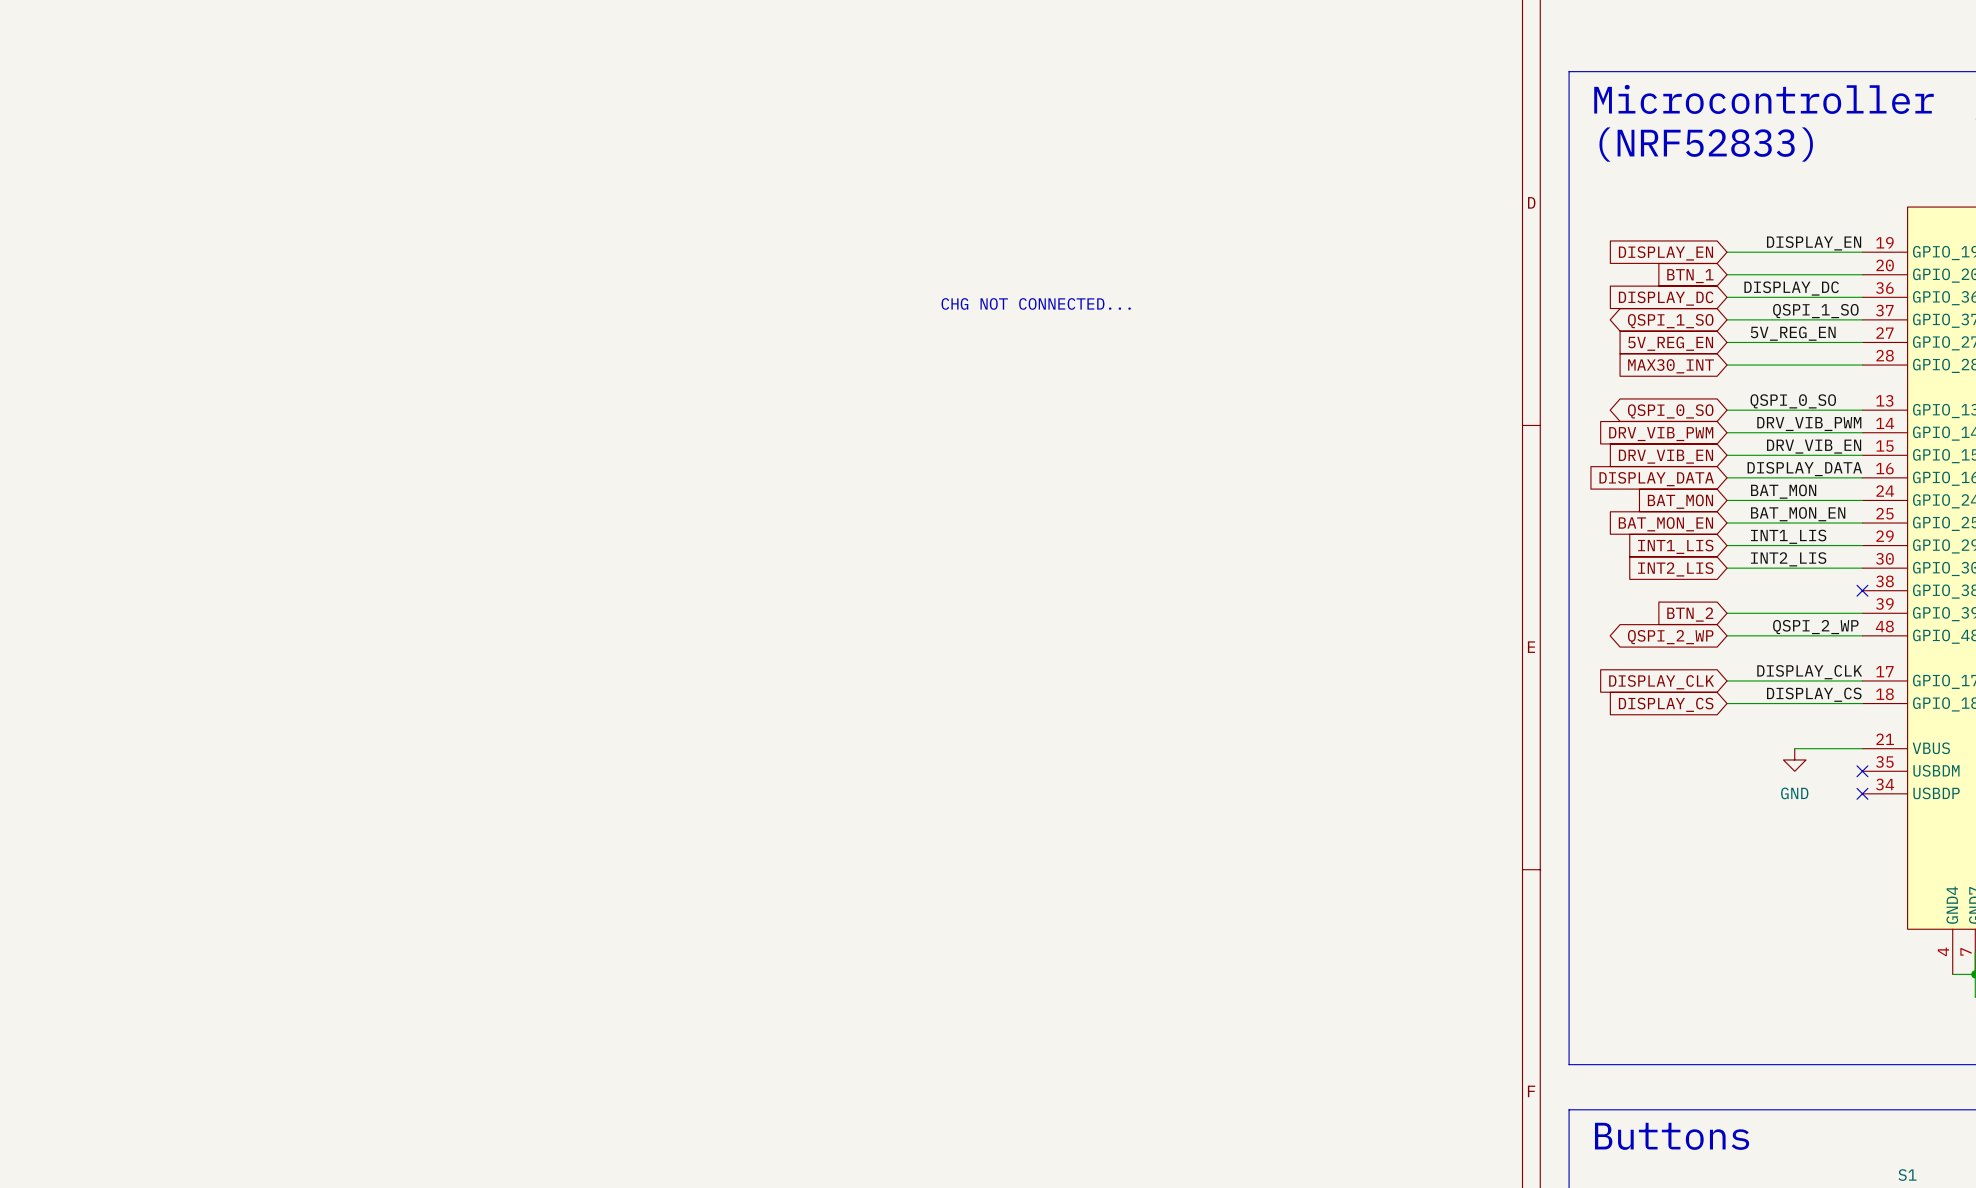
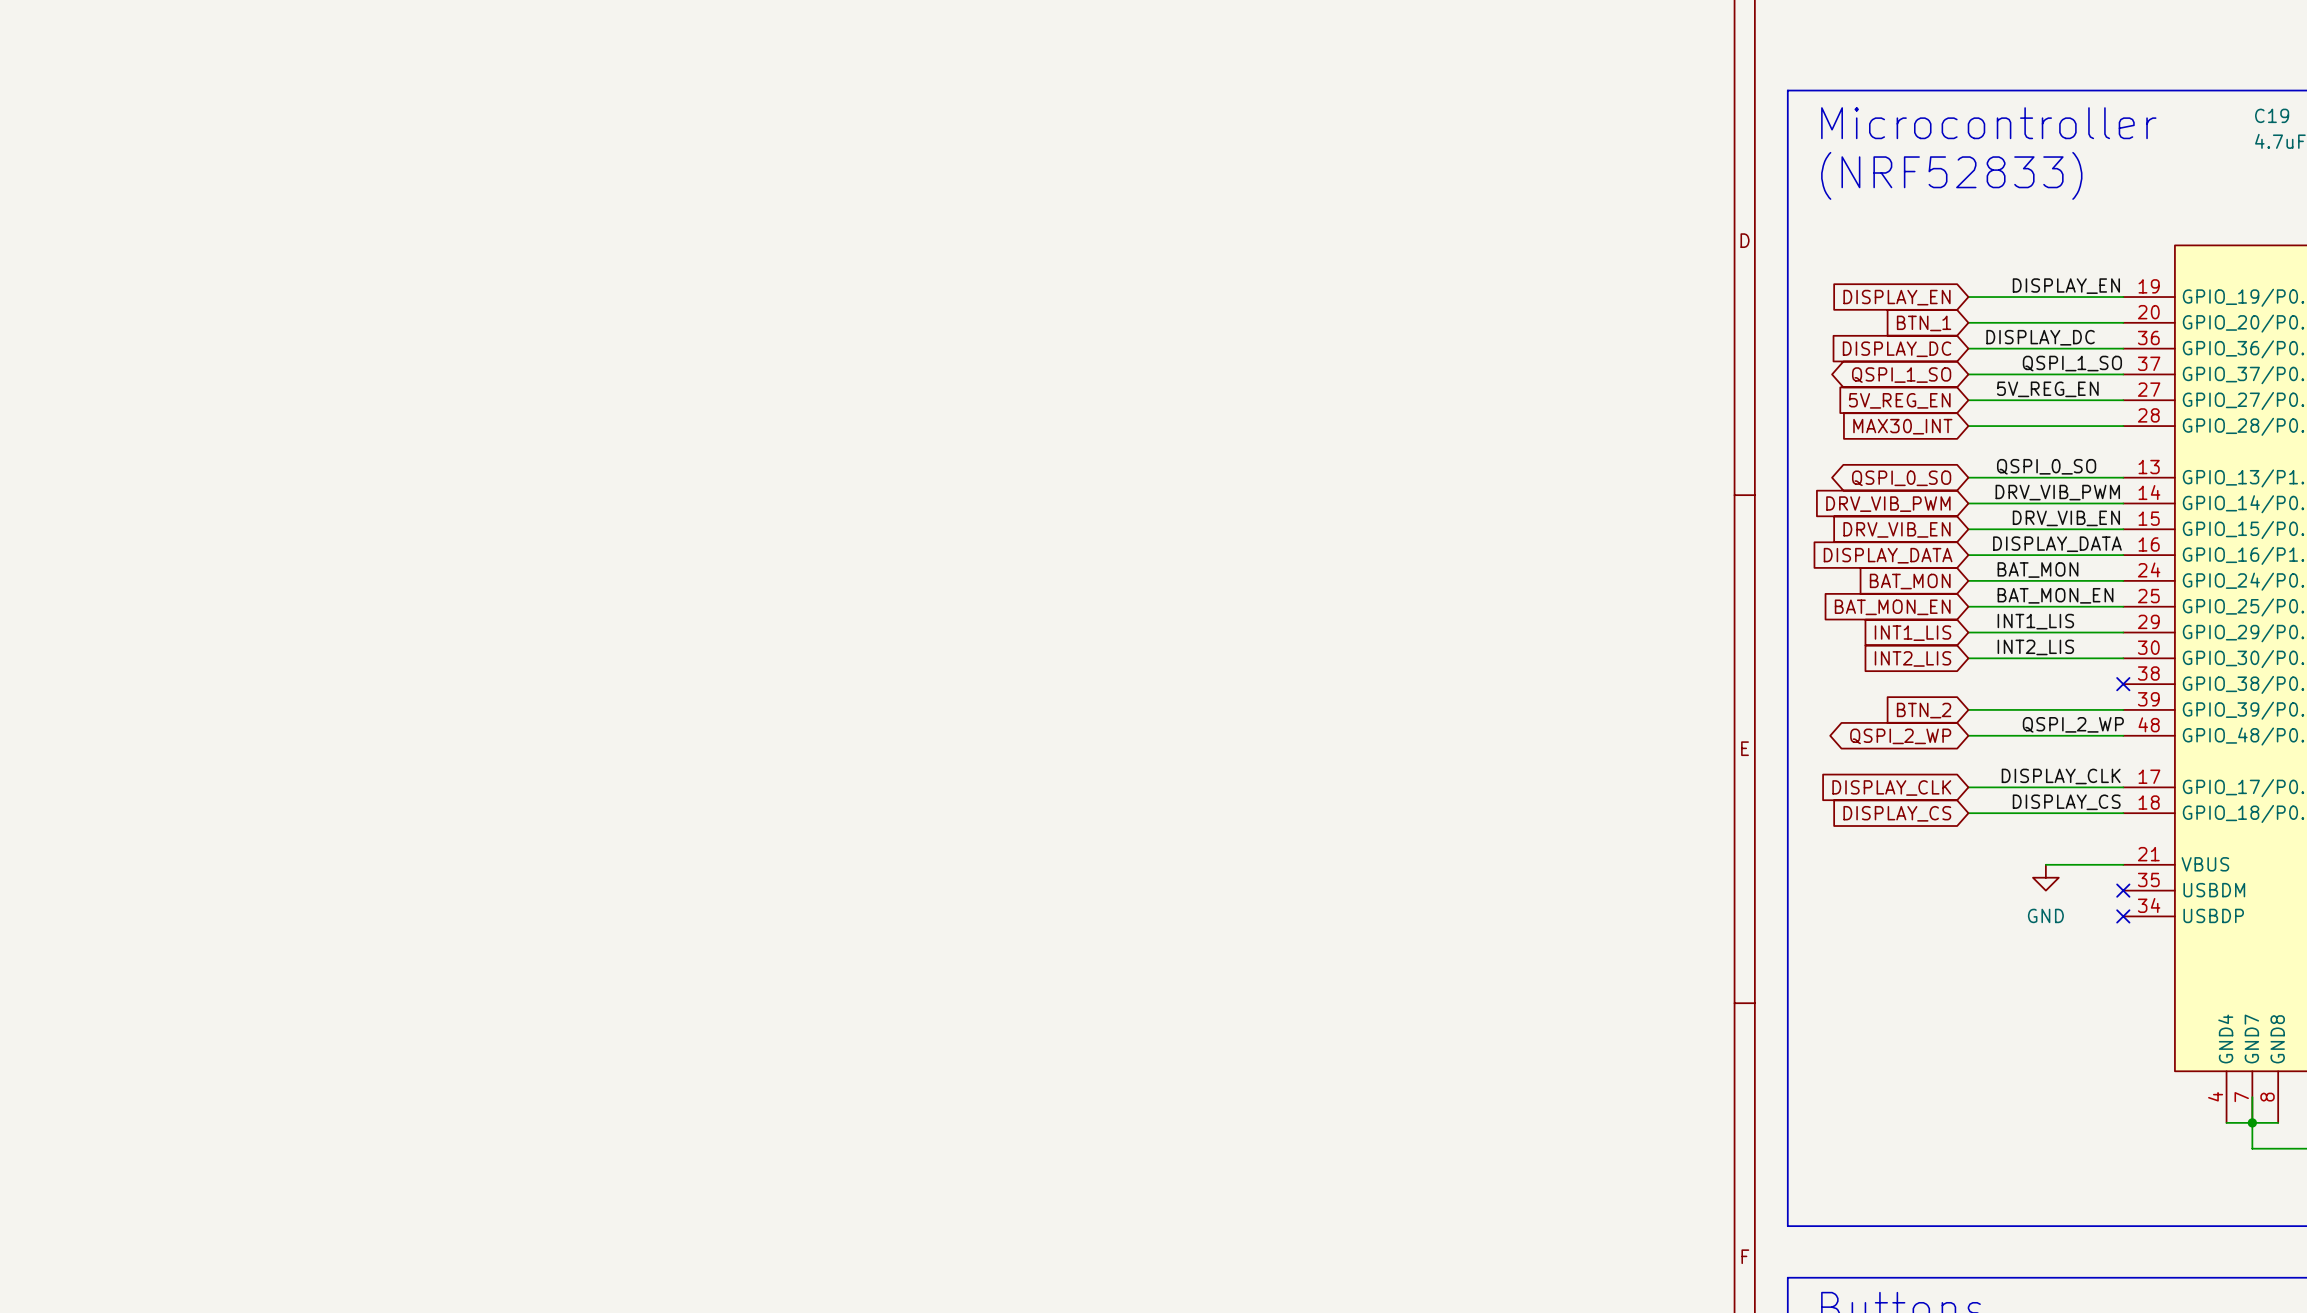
text: CHG NOT CONNECTED... (1036, 303) -> none

